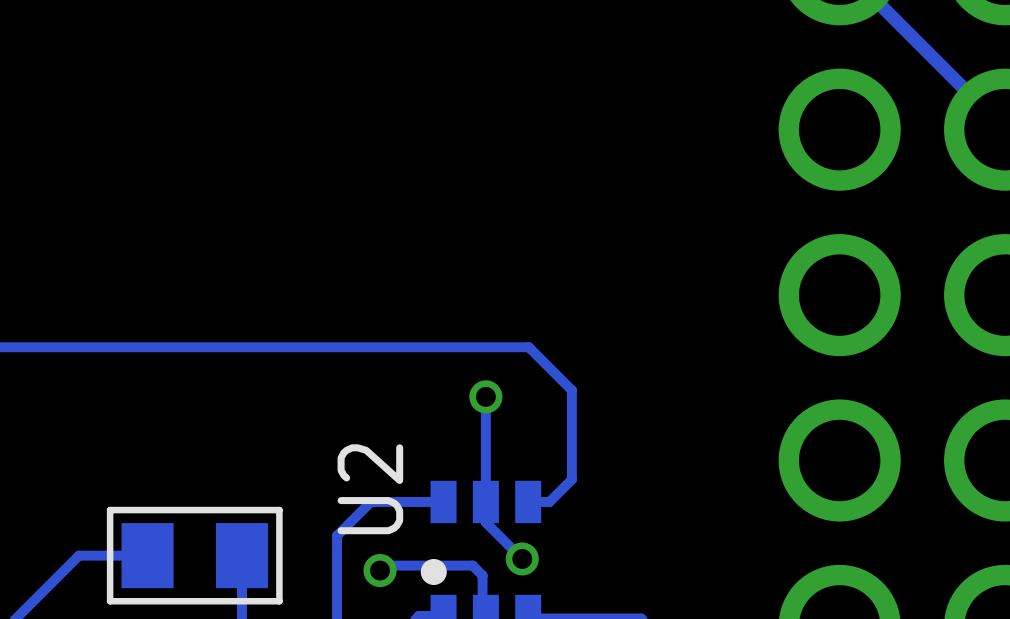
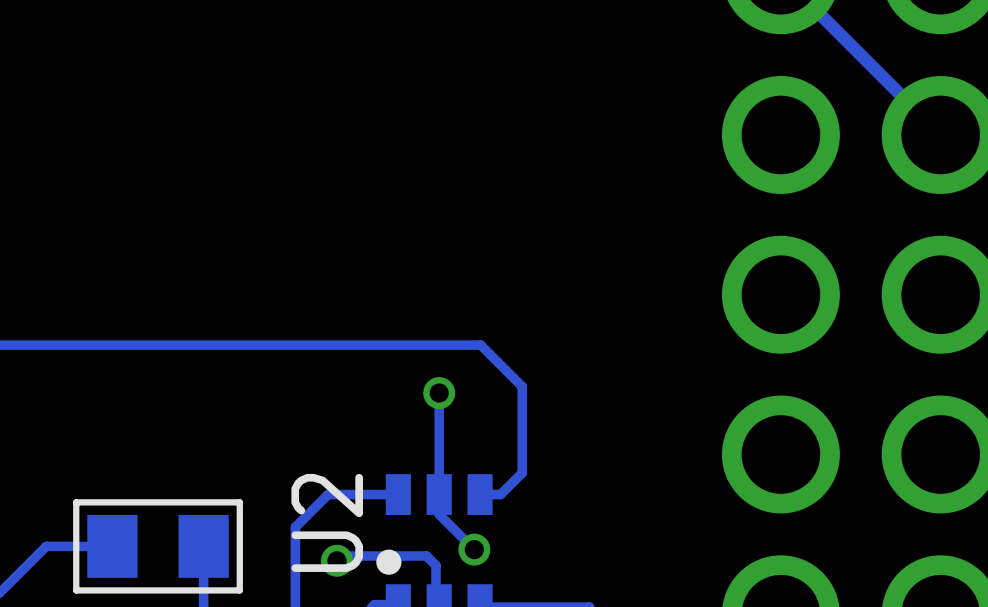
U2 name position: U2 (370, 489) -> U2 (327, 522)

